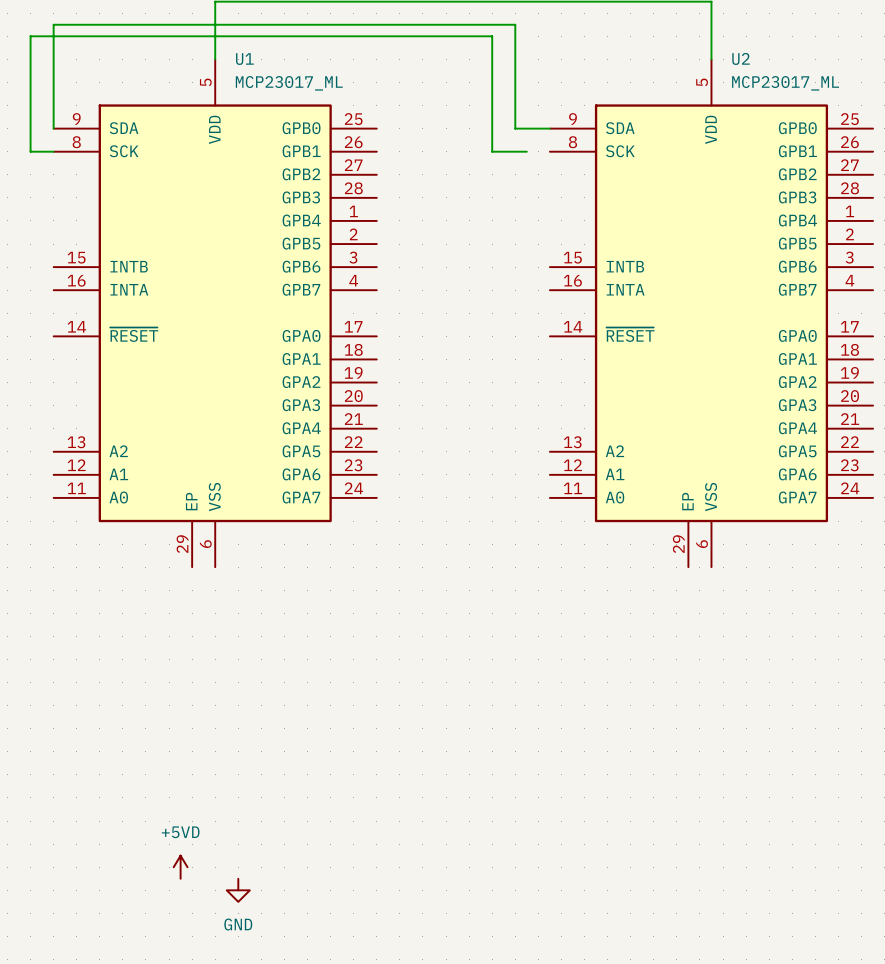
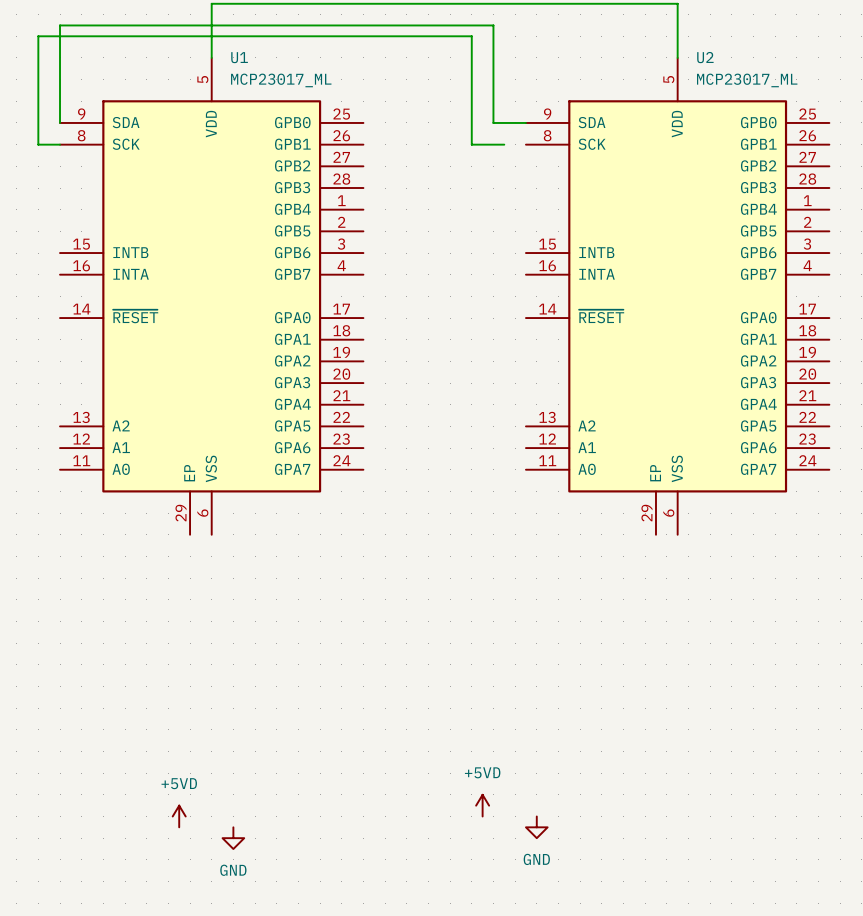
power symbol: none -> +5VD (482, 805)
power symbol: none -> GND (536, 827)

